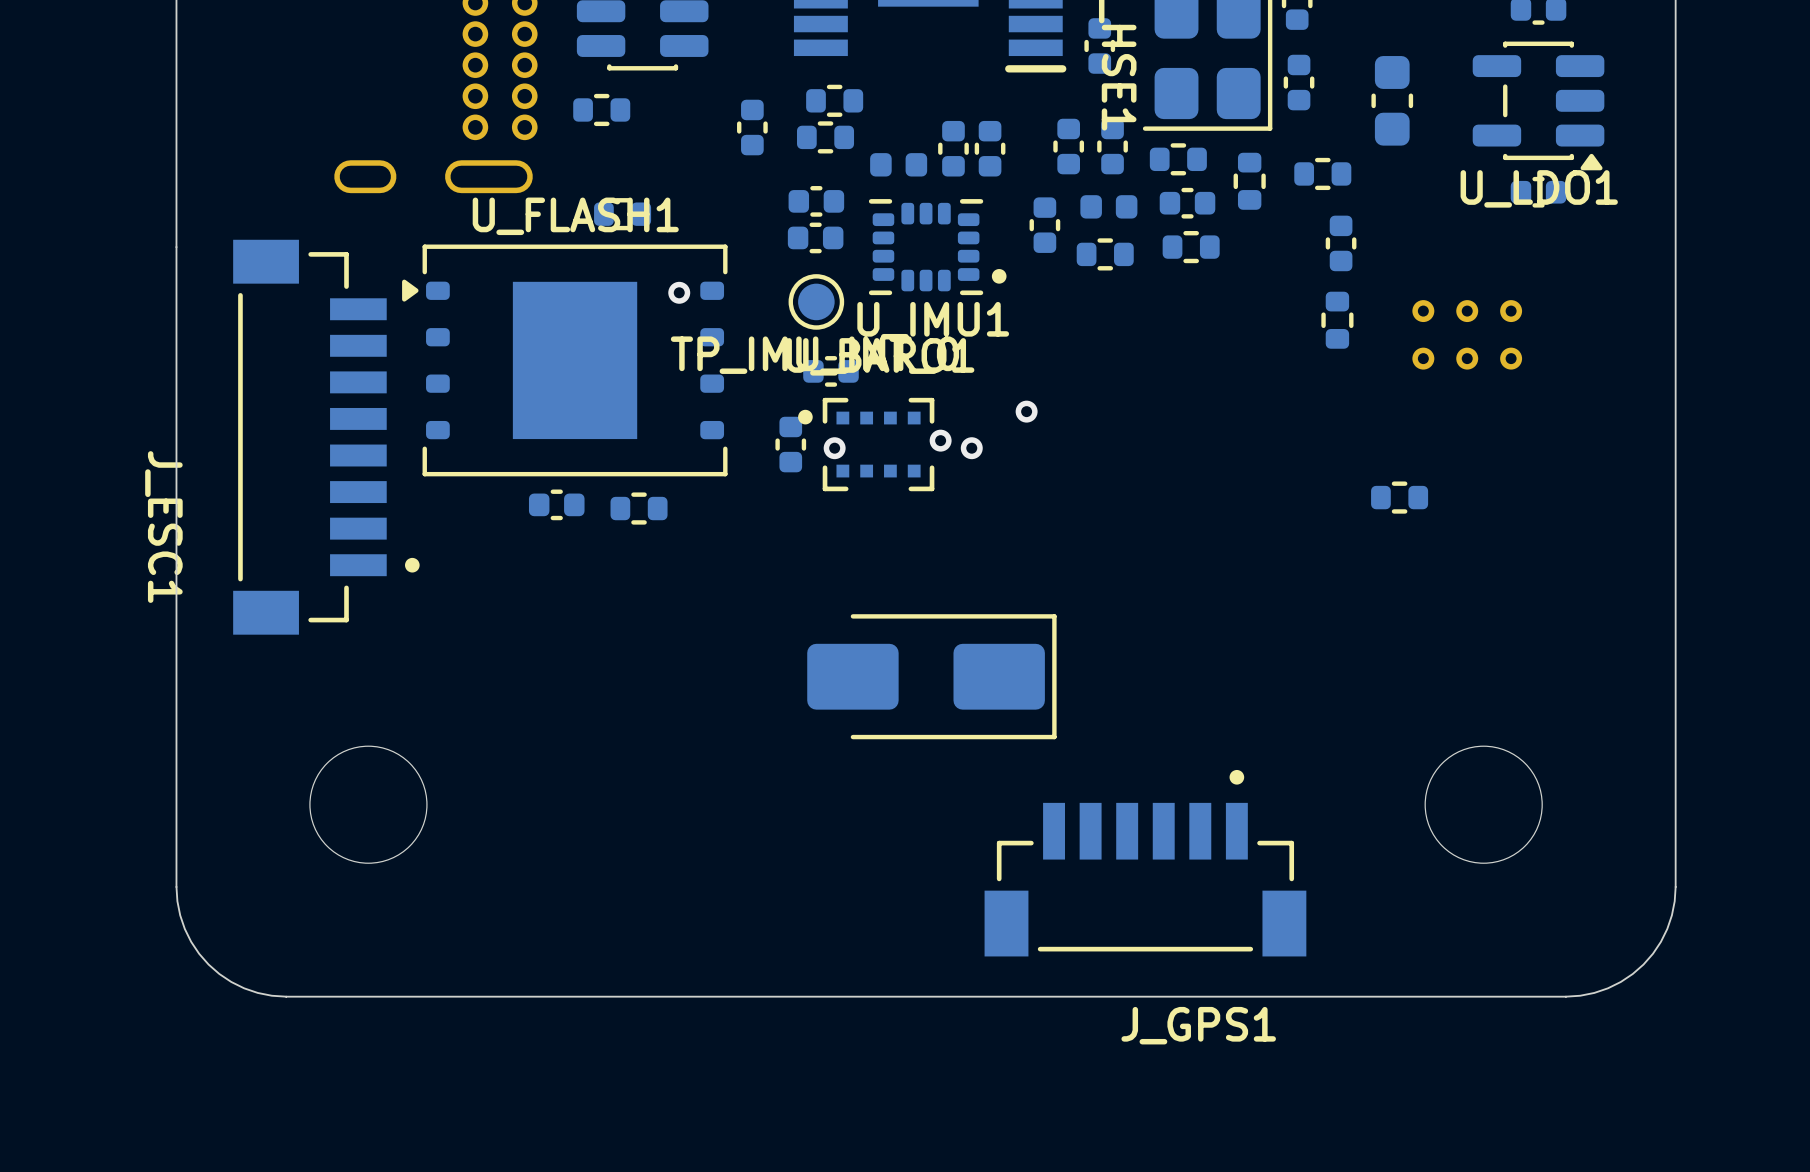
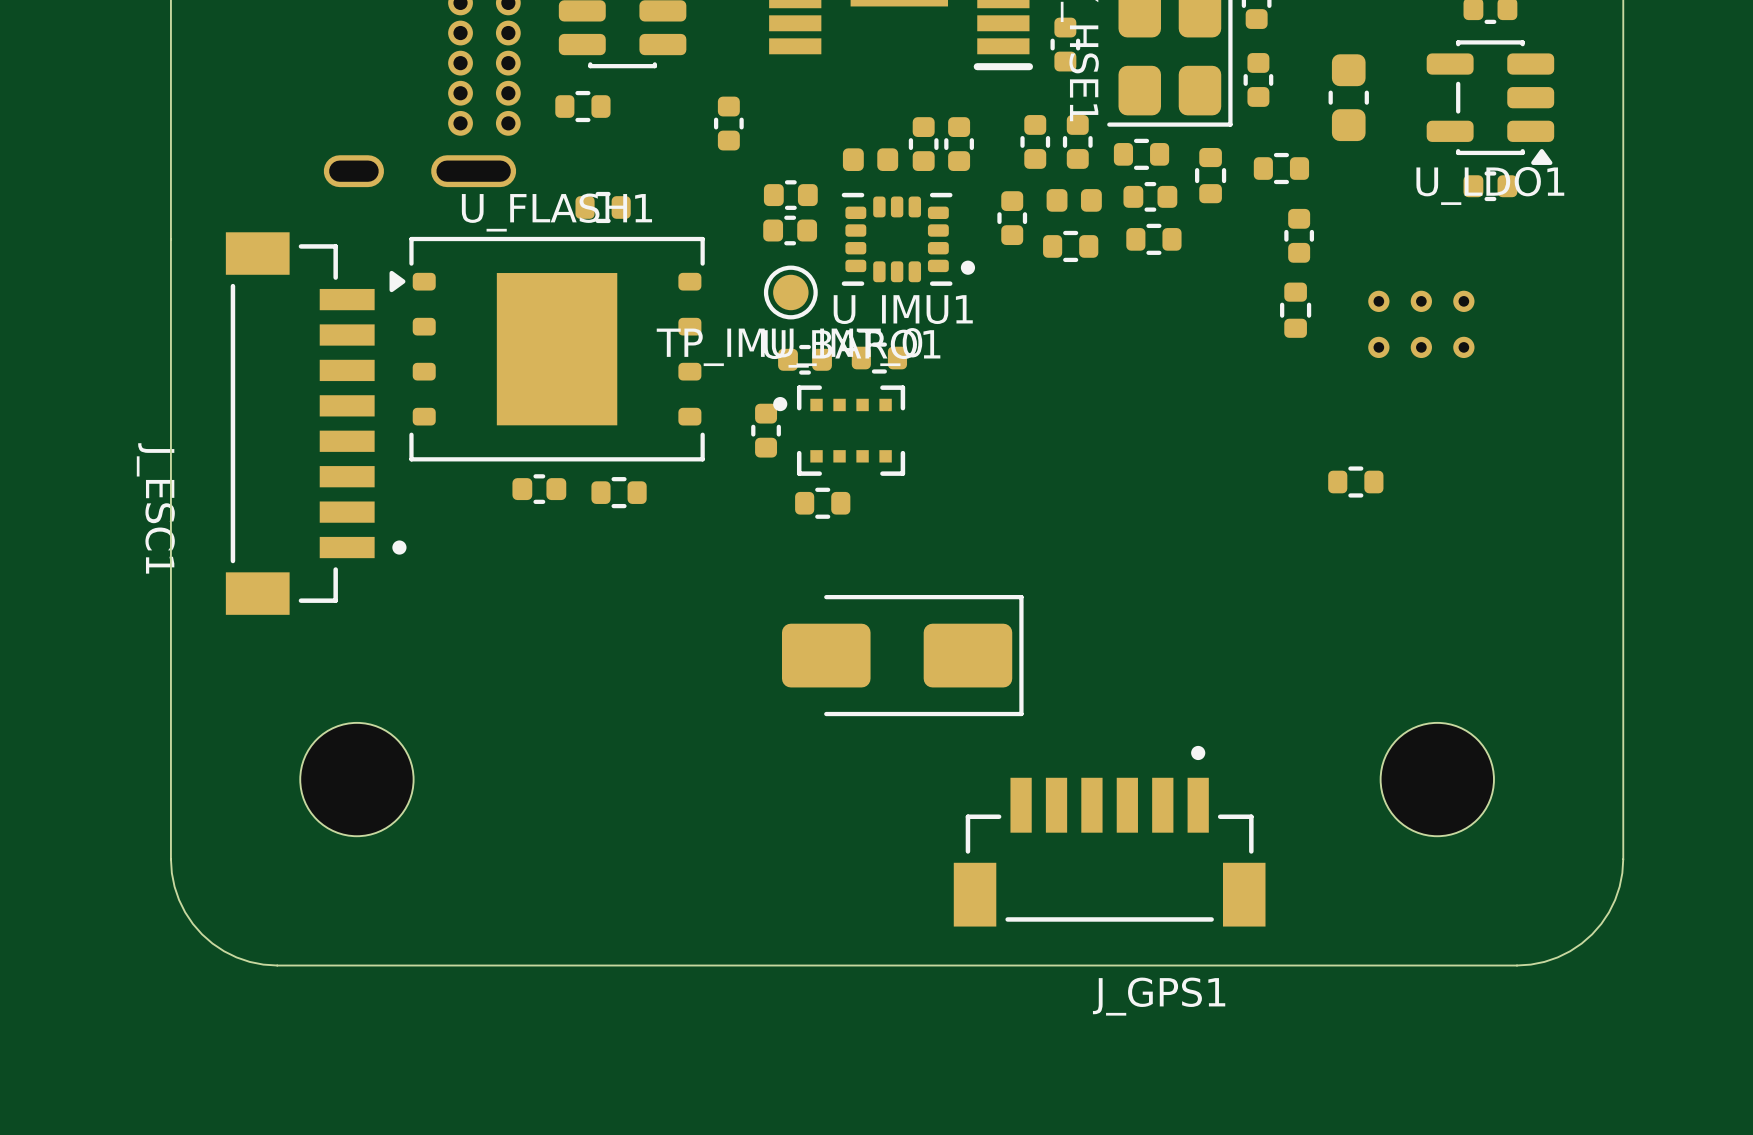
part: (834, 100) -> none
part: (825, 137) -> none
via: (679, 292) -> none
part: none -> (879, 358)
via: (1026, 411) -> none
via: (940, 440) -> none
via: (834, 448) -> none
via: (971, 448) -> none
part: none -> (822, 503)

